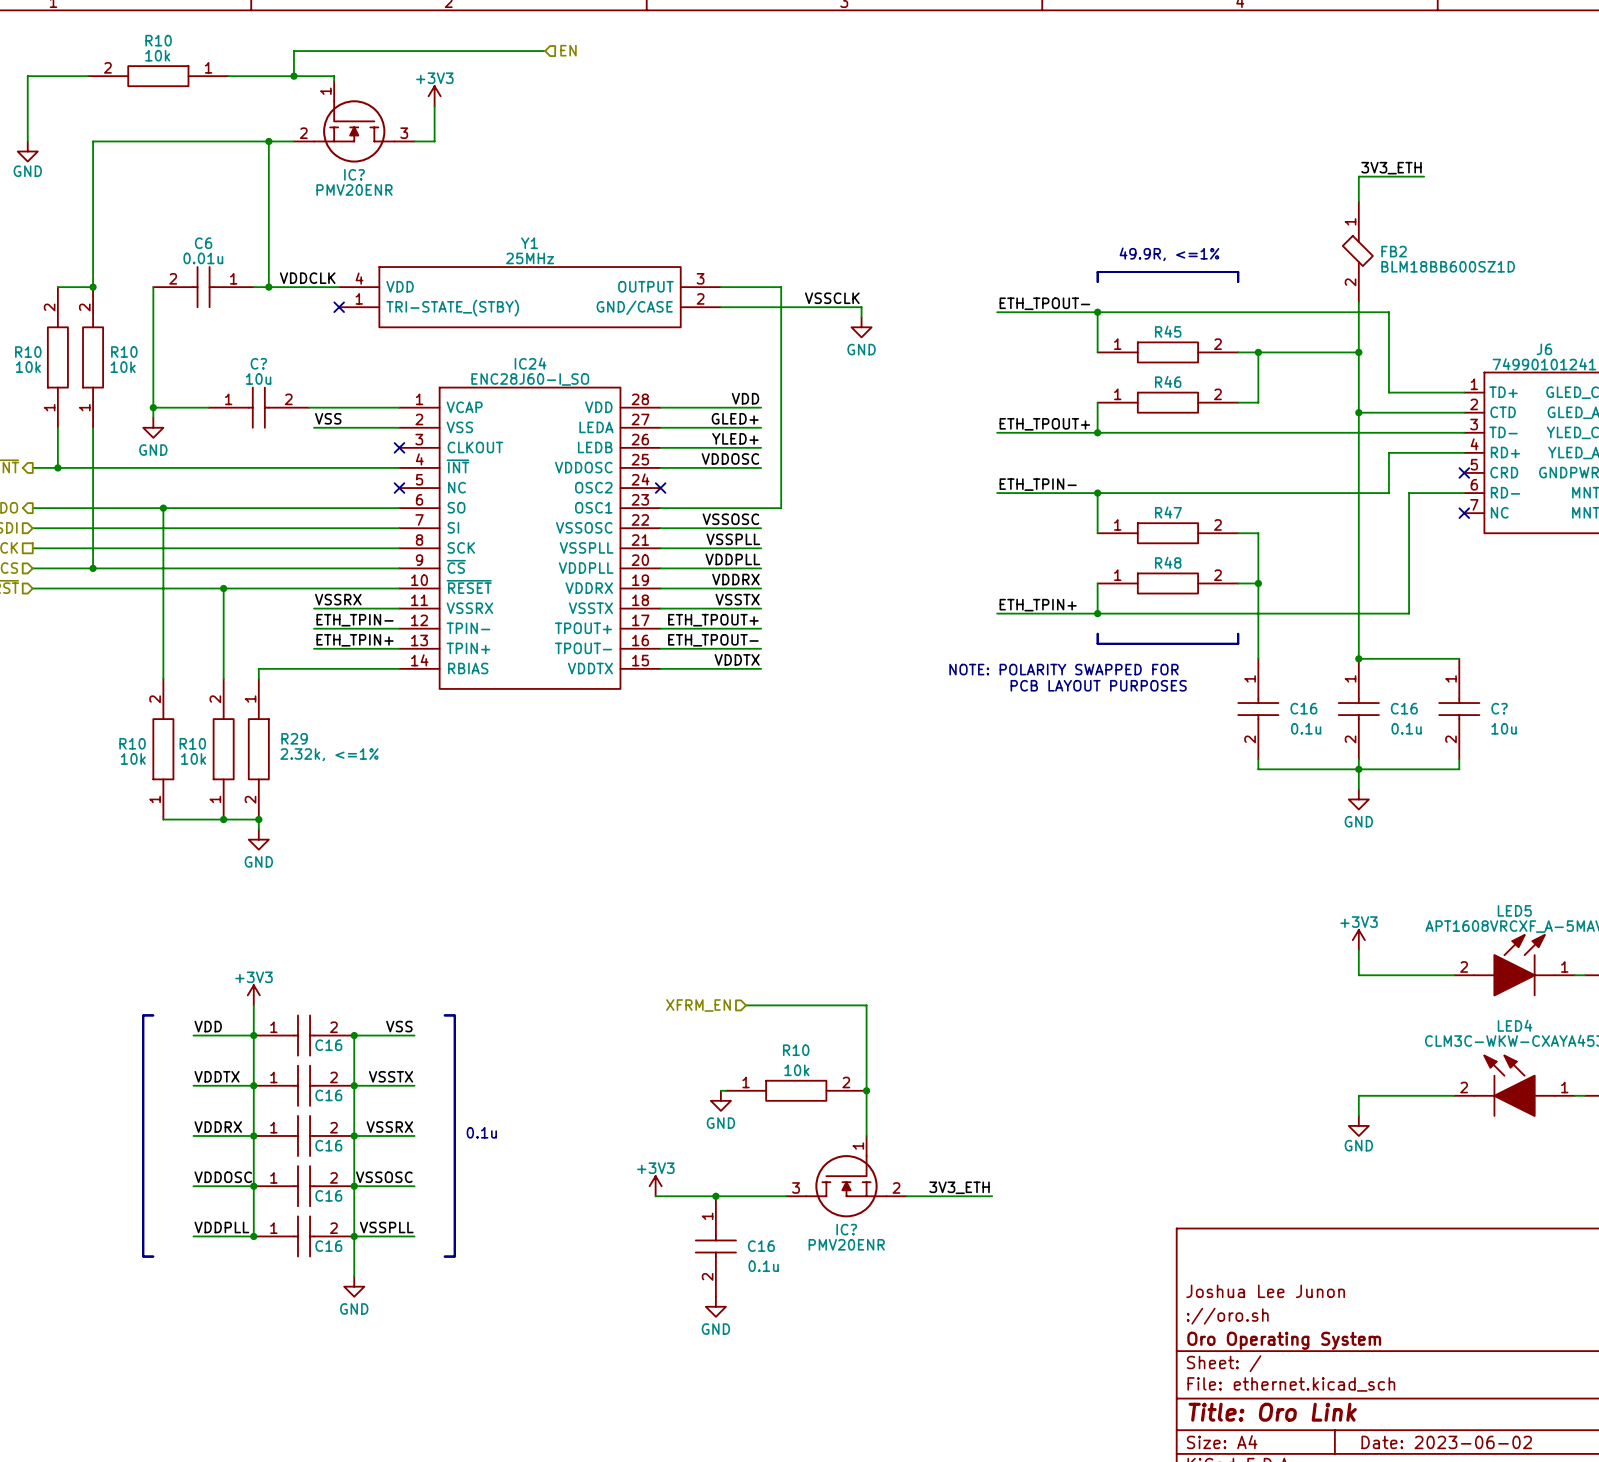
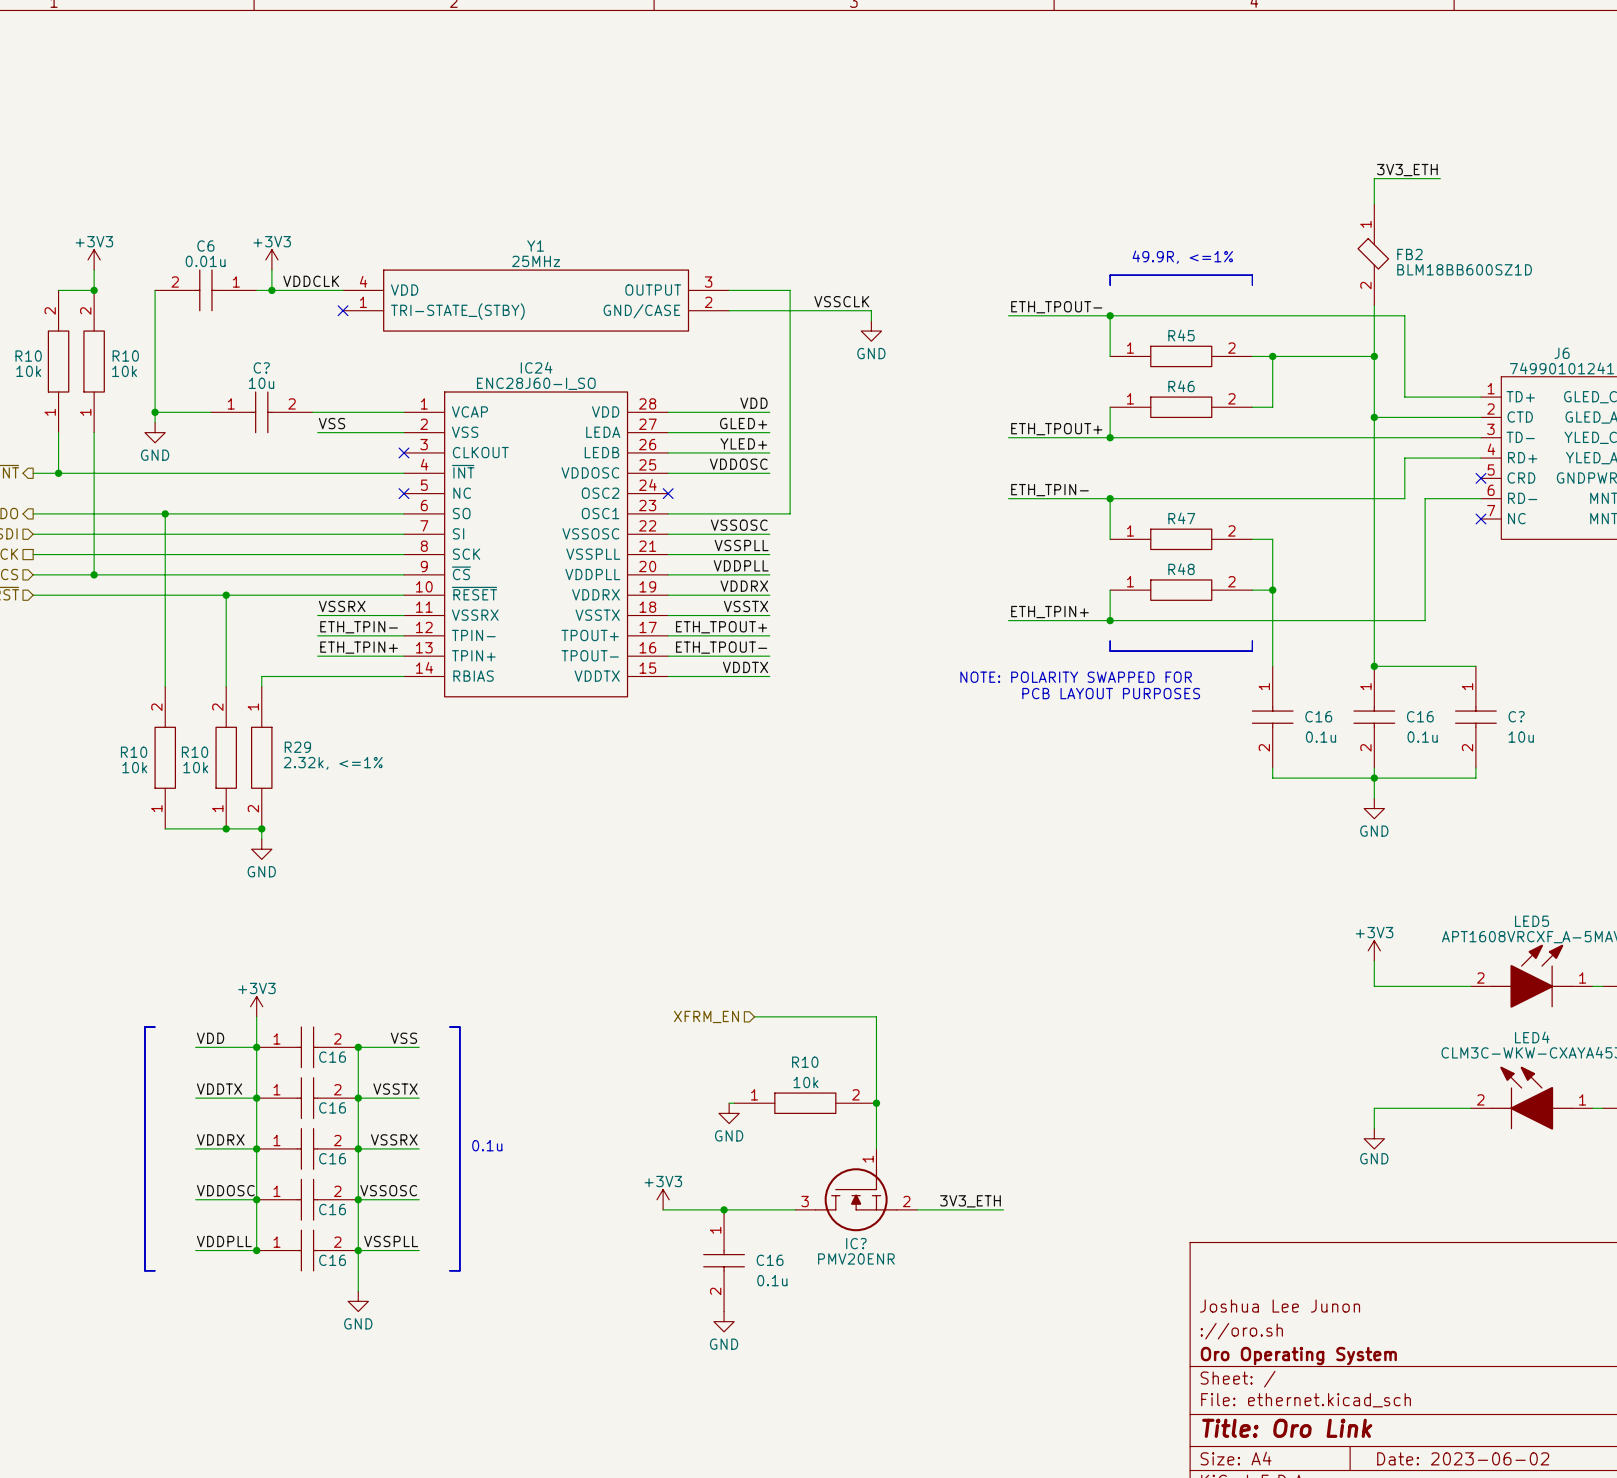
hierarchical label: EN (568, 50) -> none
wire: (545, 51) (293, 51) (293, 76) -> none
wire: (88, 76) (27, 76) (27, 141) -> none
R10: 10k (158, 76) -> none
wire: (228, 76) (334, 76) (334, 81) -> none
junction: (293, 76) -> none
power symbol: +3V3 (434, 96) -> none
wire: (434, 106) (434, 141) (414, 141) -> none
IC?: PMV20ENR (354, 121) -> none
wire: (268, 141) (268, 267) -> none
junction: (268, 141) -> none
wire: (293, 141) (93, 141) (93, 267) -> none
power symbol: GND (27, 151) -> none
power symbol: none -> +3V3 (94, 259)
power symbol: none -> +3V3 (271, 259)

